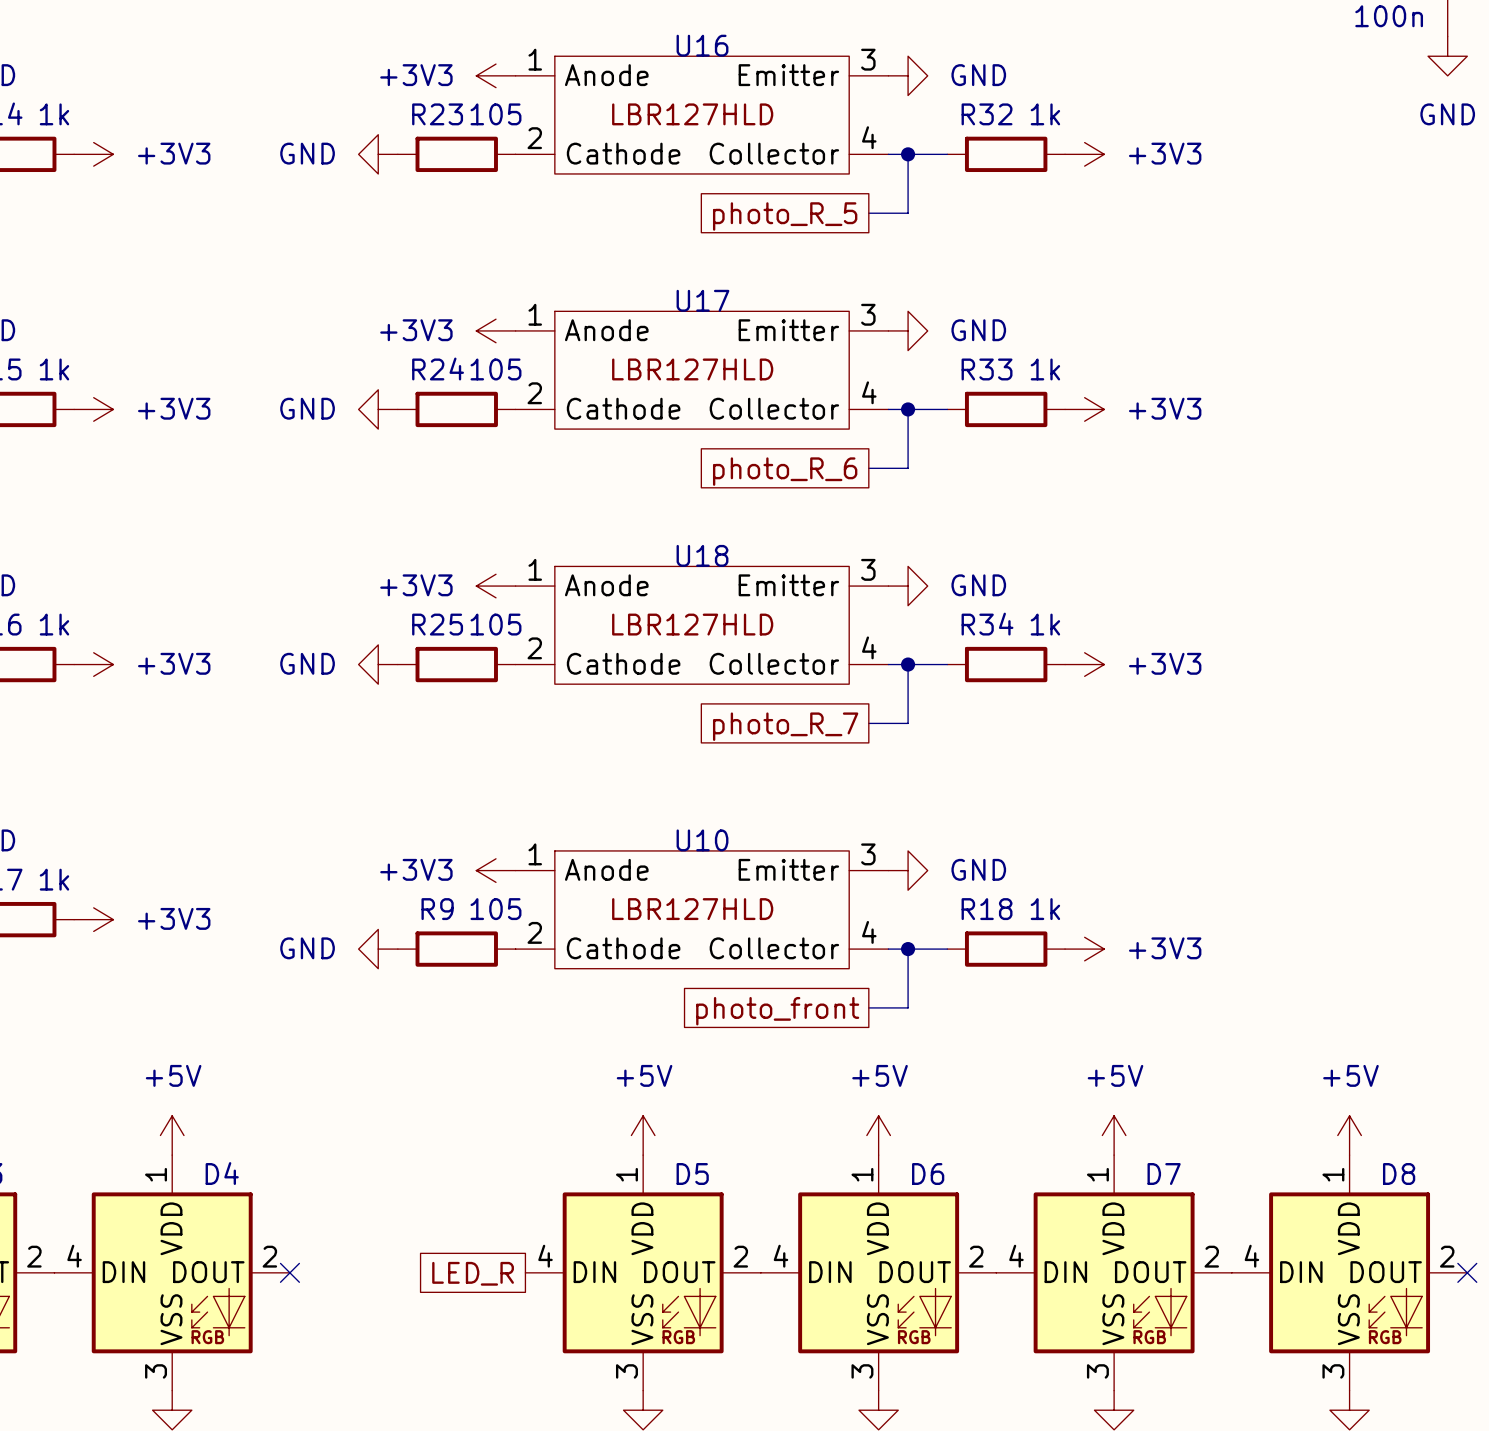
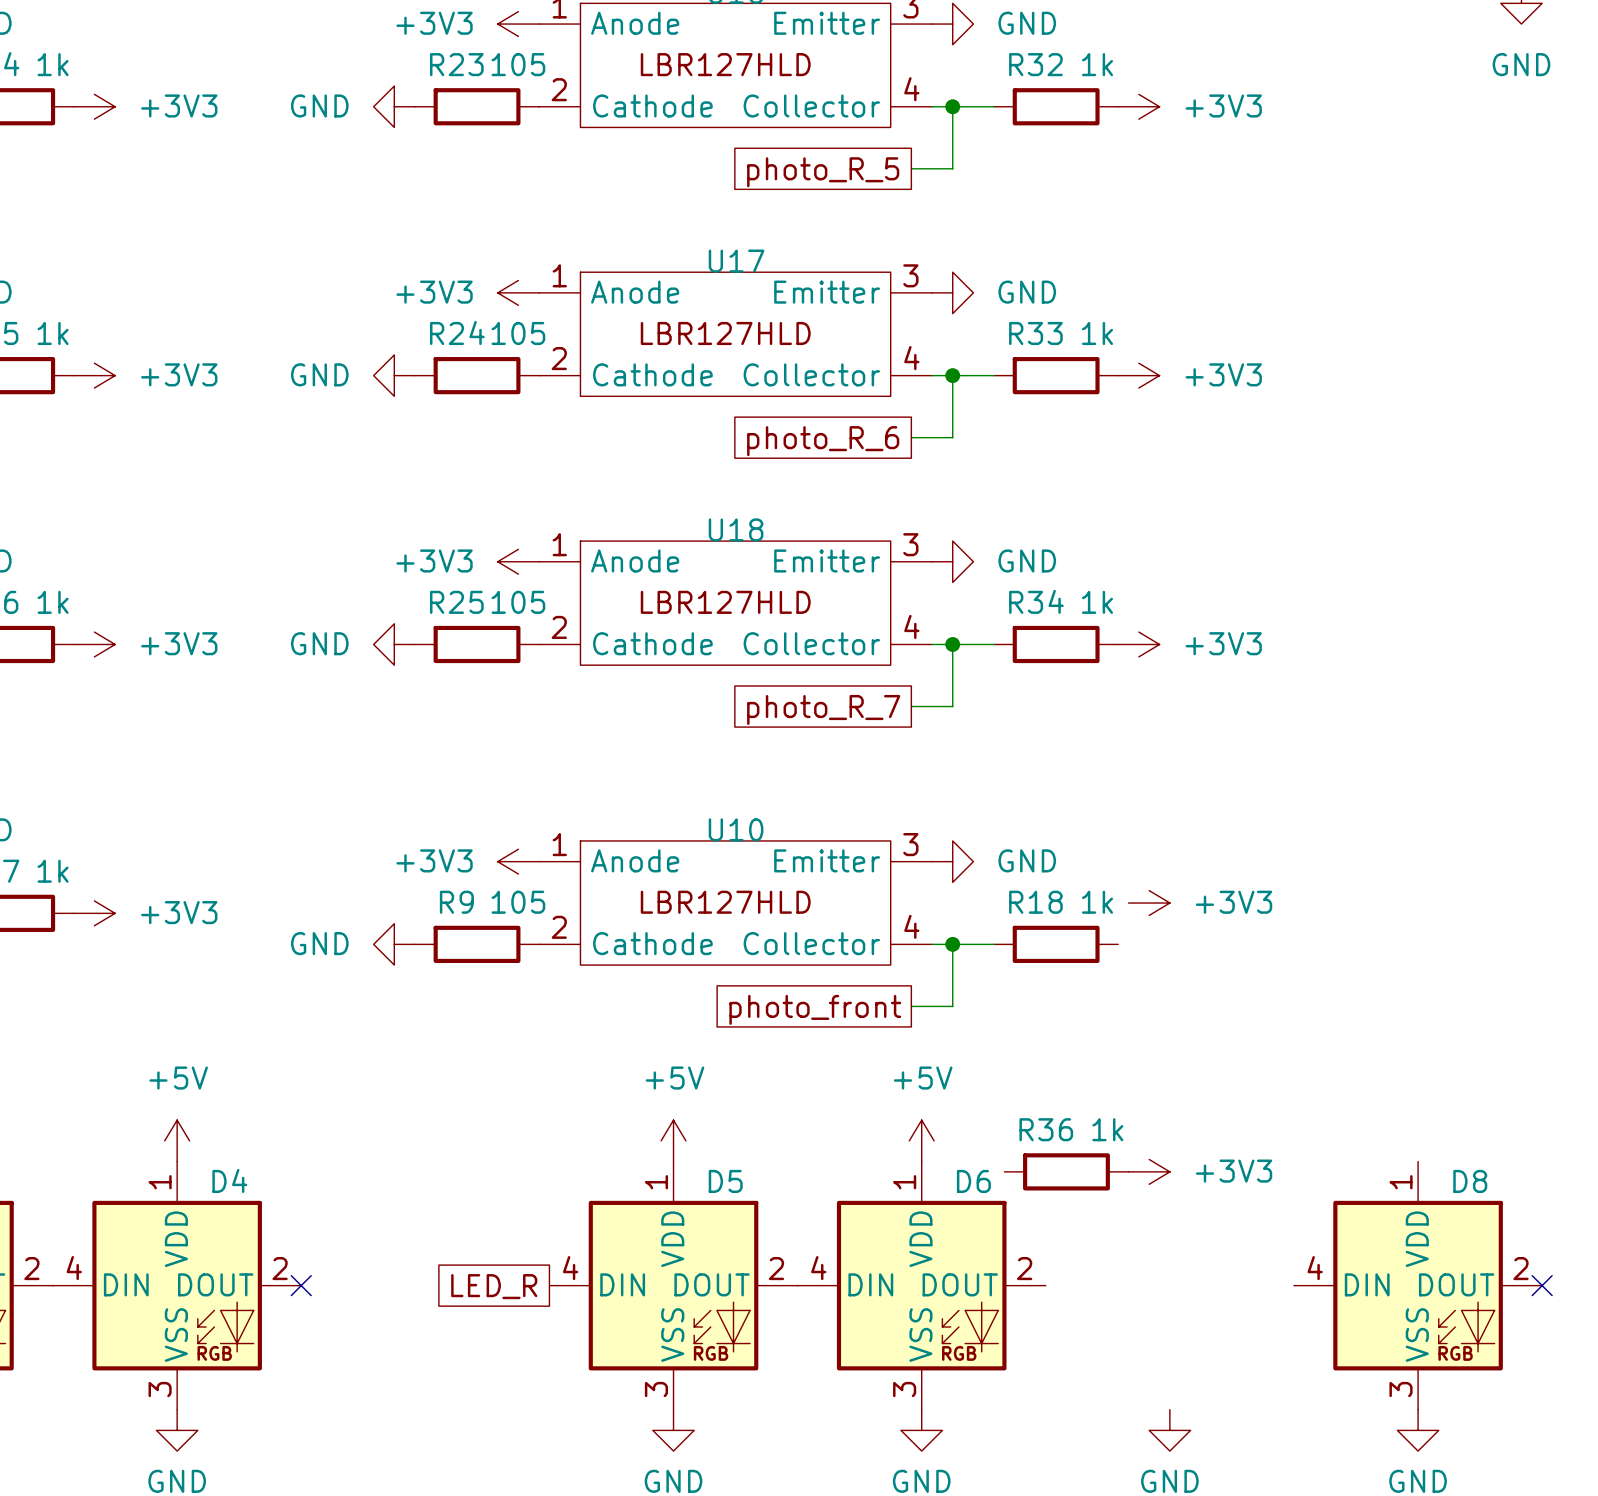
power symbol position: +3V3 (1084, 949) -> +3V3 (1149, 903)
power symbol: +5V (1114, 1135) -> none
power symbol: +5V (1349, 1135) -> none
R36: none -> 1k (1066, 1171)
power symbol: none -> +3V3 (1149, 1171)
D7: (1114, 1272) -> none

